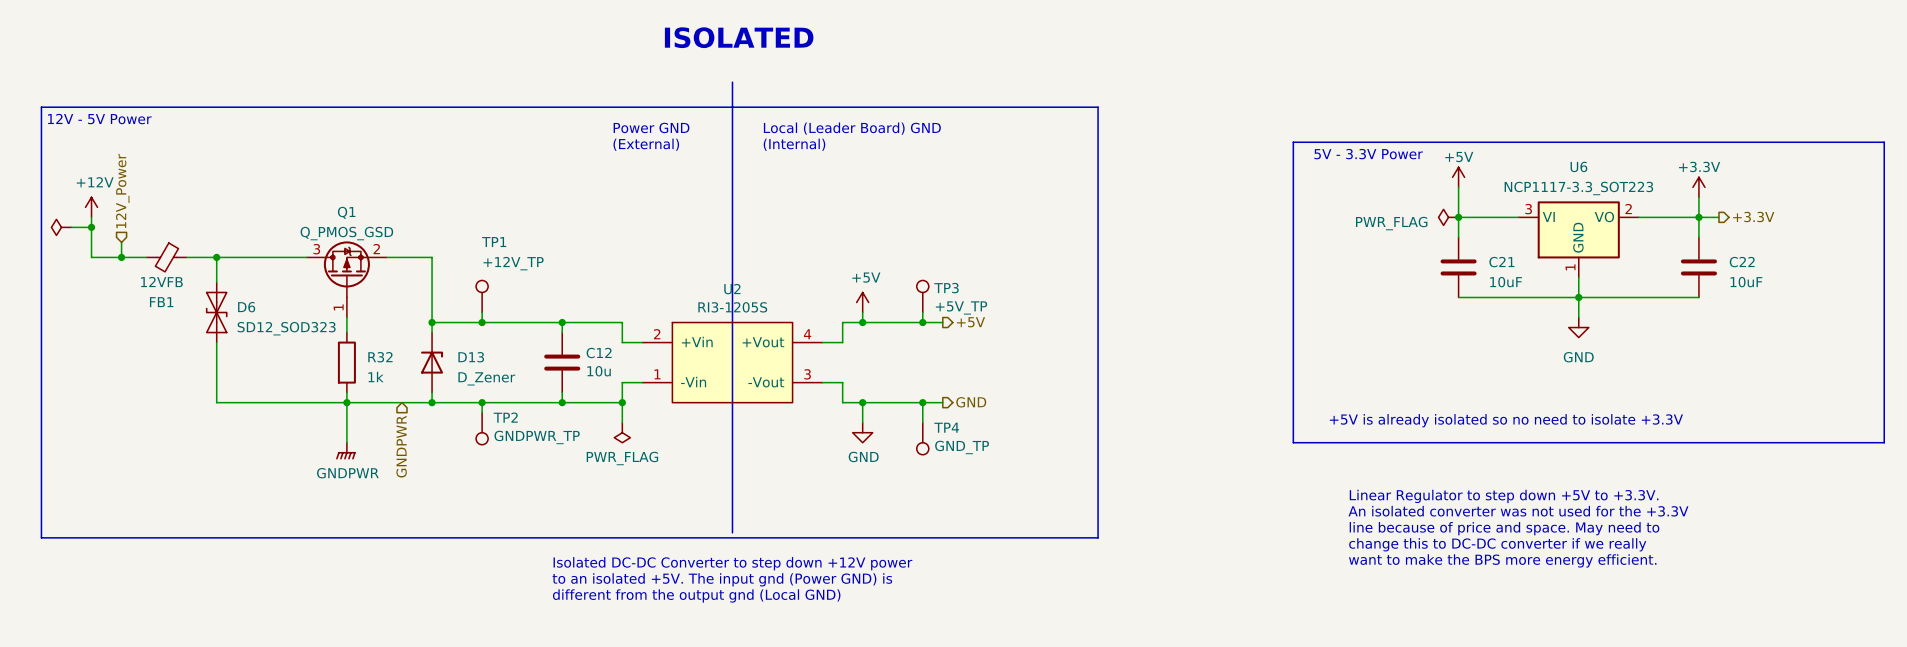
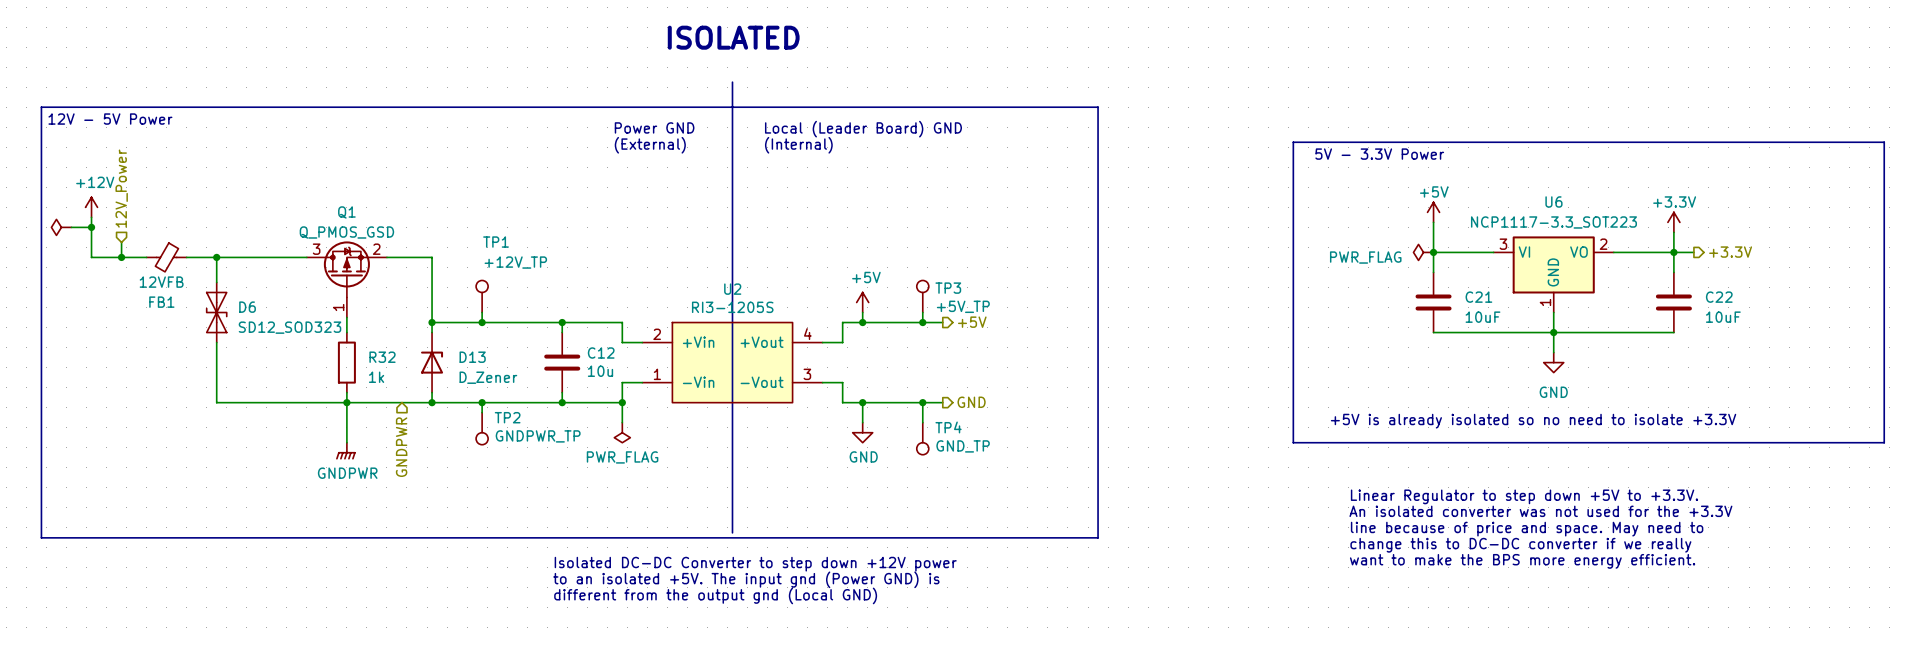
power symbol position: +5V (1458, 177) -> +5V (1433, 212)
wire: (1458, 187) (1458, 237) -> (1433, 222) (1433, 272)
power symbol position: +3.3V (1698, 187) -> +3.3V (1673, 222)
wire: (1698, 197) (1698, 237) -> (1673, 232) (1673, 272)
power symbol position: PWR_FLAG (1448, 217) -> PWR_FLAG (1423, 252)
wire: (1458, 217) (1518, 217) -> (1433, 252) (1493, 252)
junction position: (1458, 217) -> (1433, 252)
wire: (1638, 217) (1718, 217) -> (1613, 252) (1693, 252)
junction position: (1698, 217) -> (1673, 252)
hierarchical label position: +3.3V (1753, 217) -> +3.3V (1730, 252)
U6 position: (1578, 239) -> (1553, 274)
C21 position: (1458, 267) -> (1433, 302)
C22 position: (1698, 267) -> (1673, 302)
wire: (1578, 277) (1578, 317) -> (1553, 312) (1553, 352)
wire: (1458, 297) (1698, 297) -> (1433, 332) (1673, 332)
junction position: (1578, 297) -> (1553, 332)
power symbol position: GND (1578, 327) -> GND (1553, 362)

